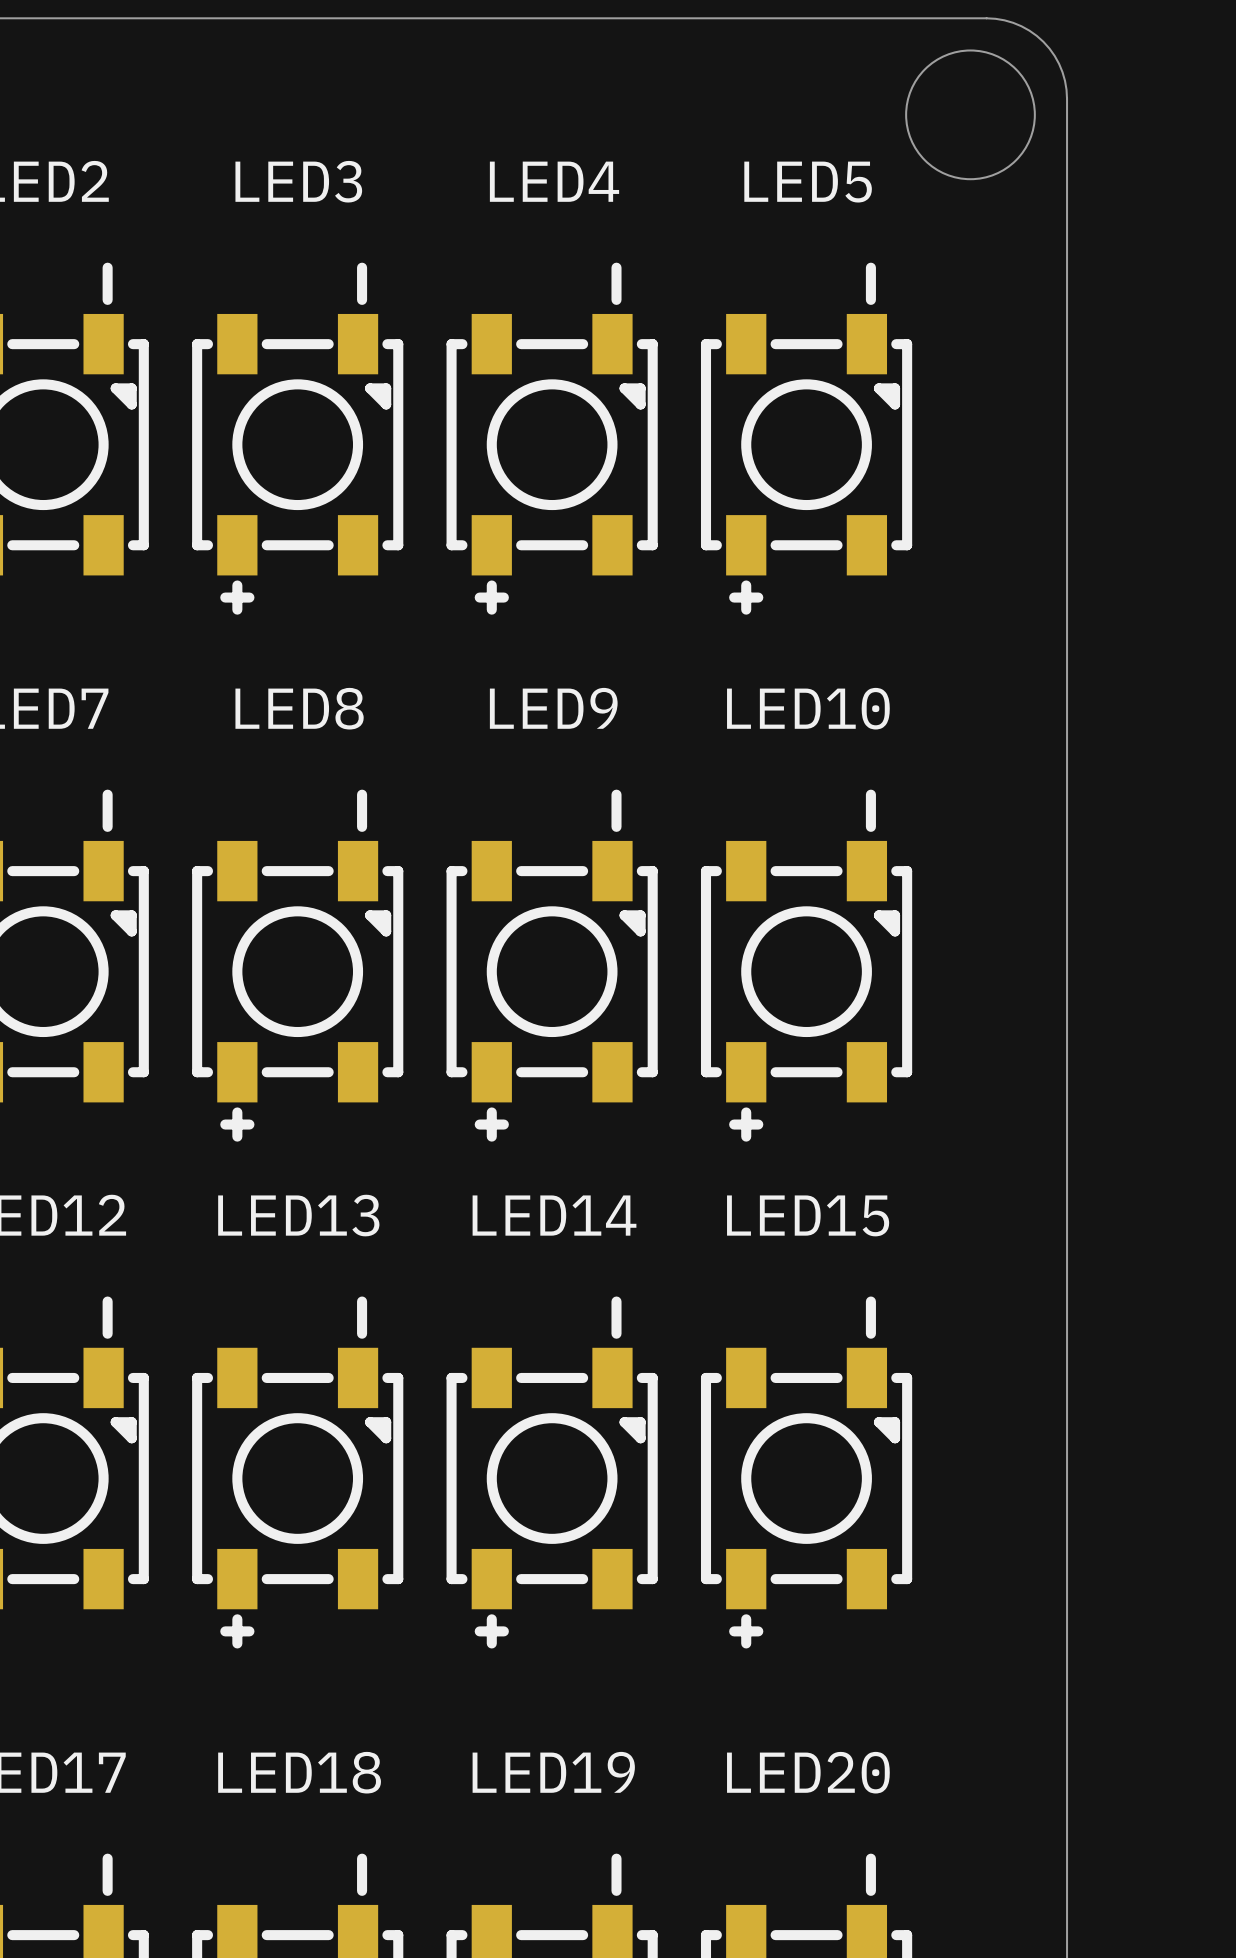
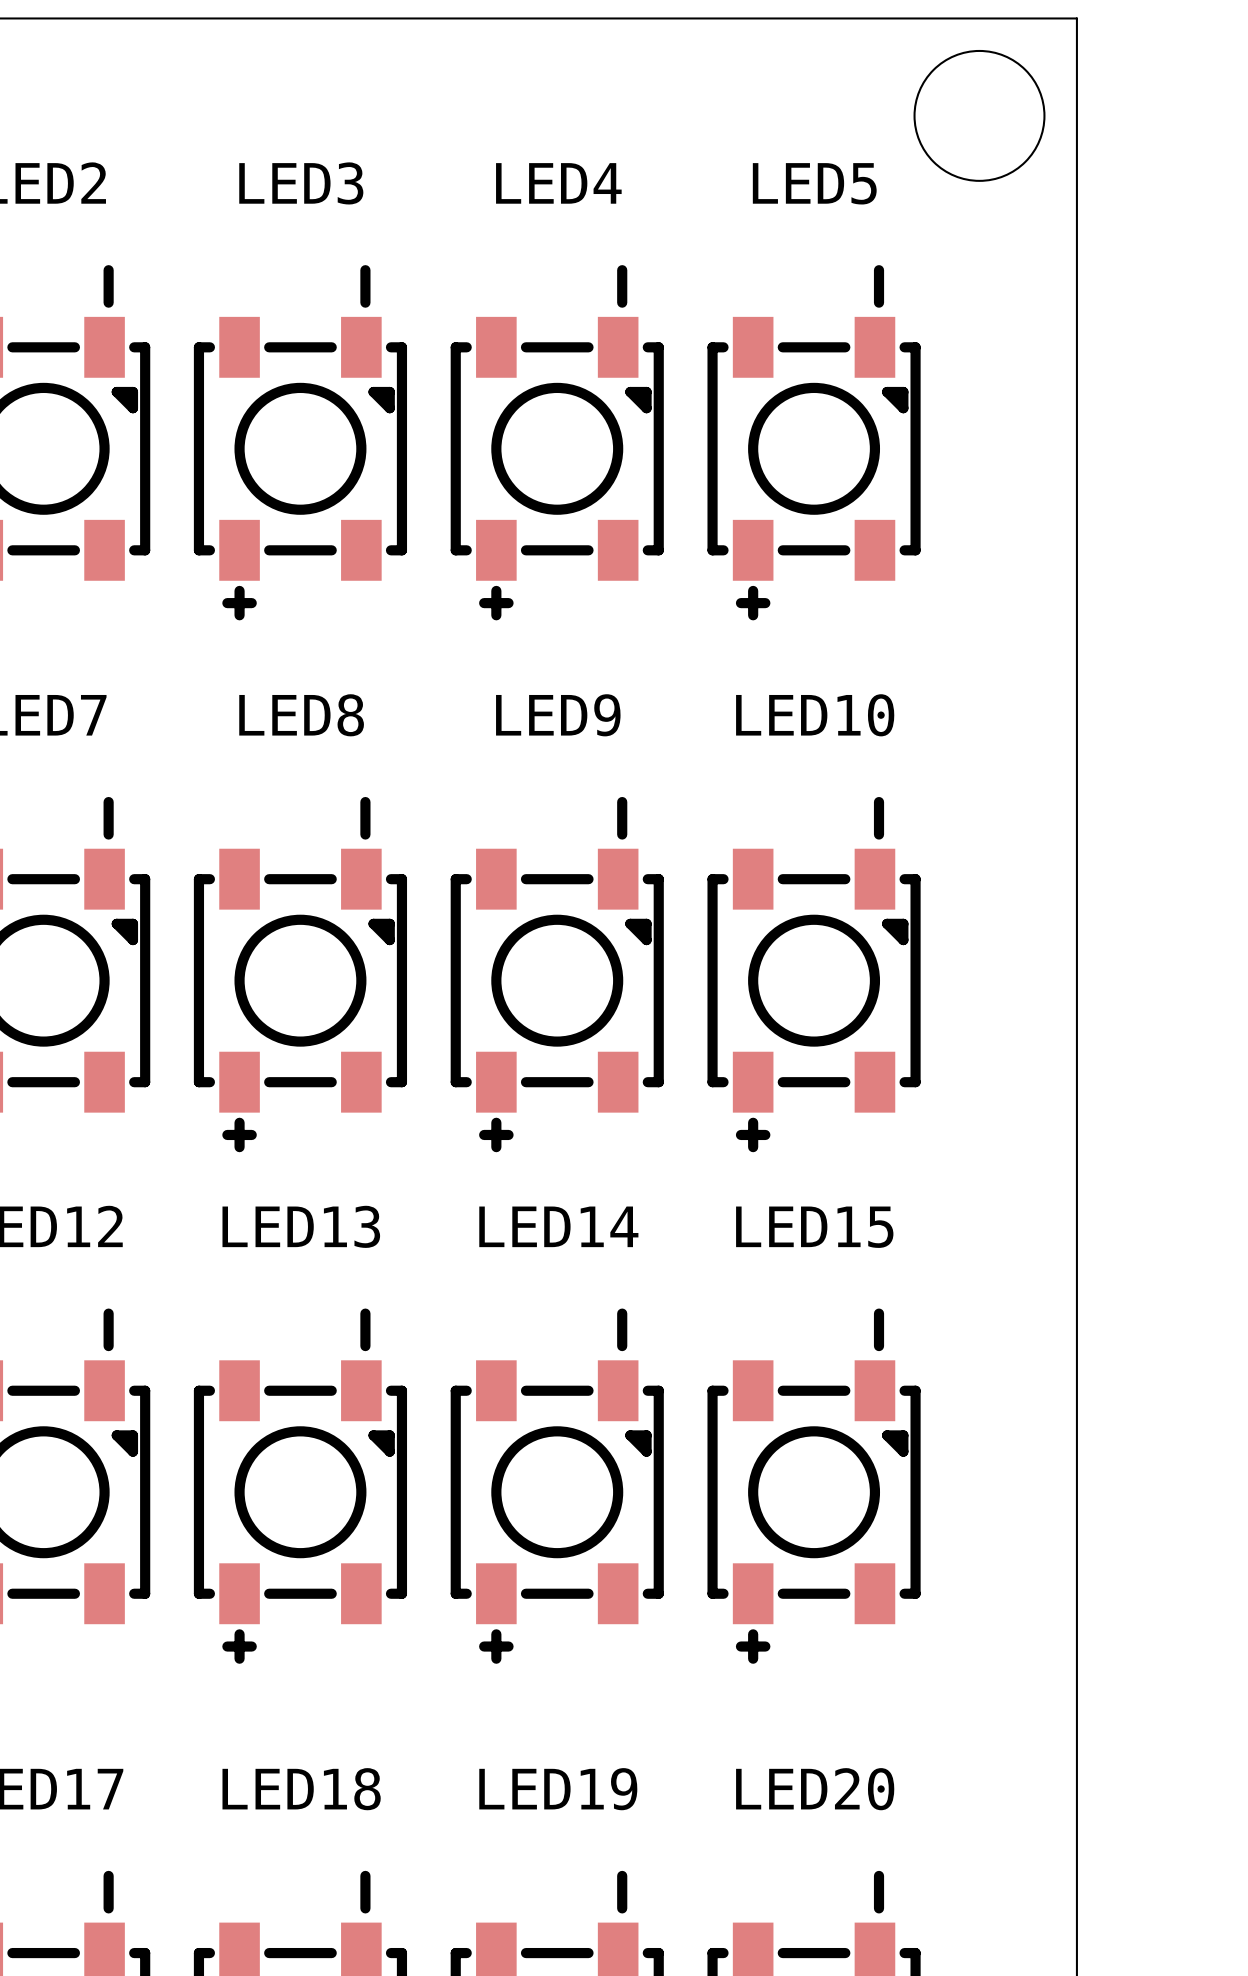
board edge: (986, 18) (1004, 20) (1021, 26) (1043, 41) (1059, 63) (1065, 80) (1067, 98) -> (995, 18) (1076, 18) (1076, 99)

